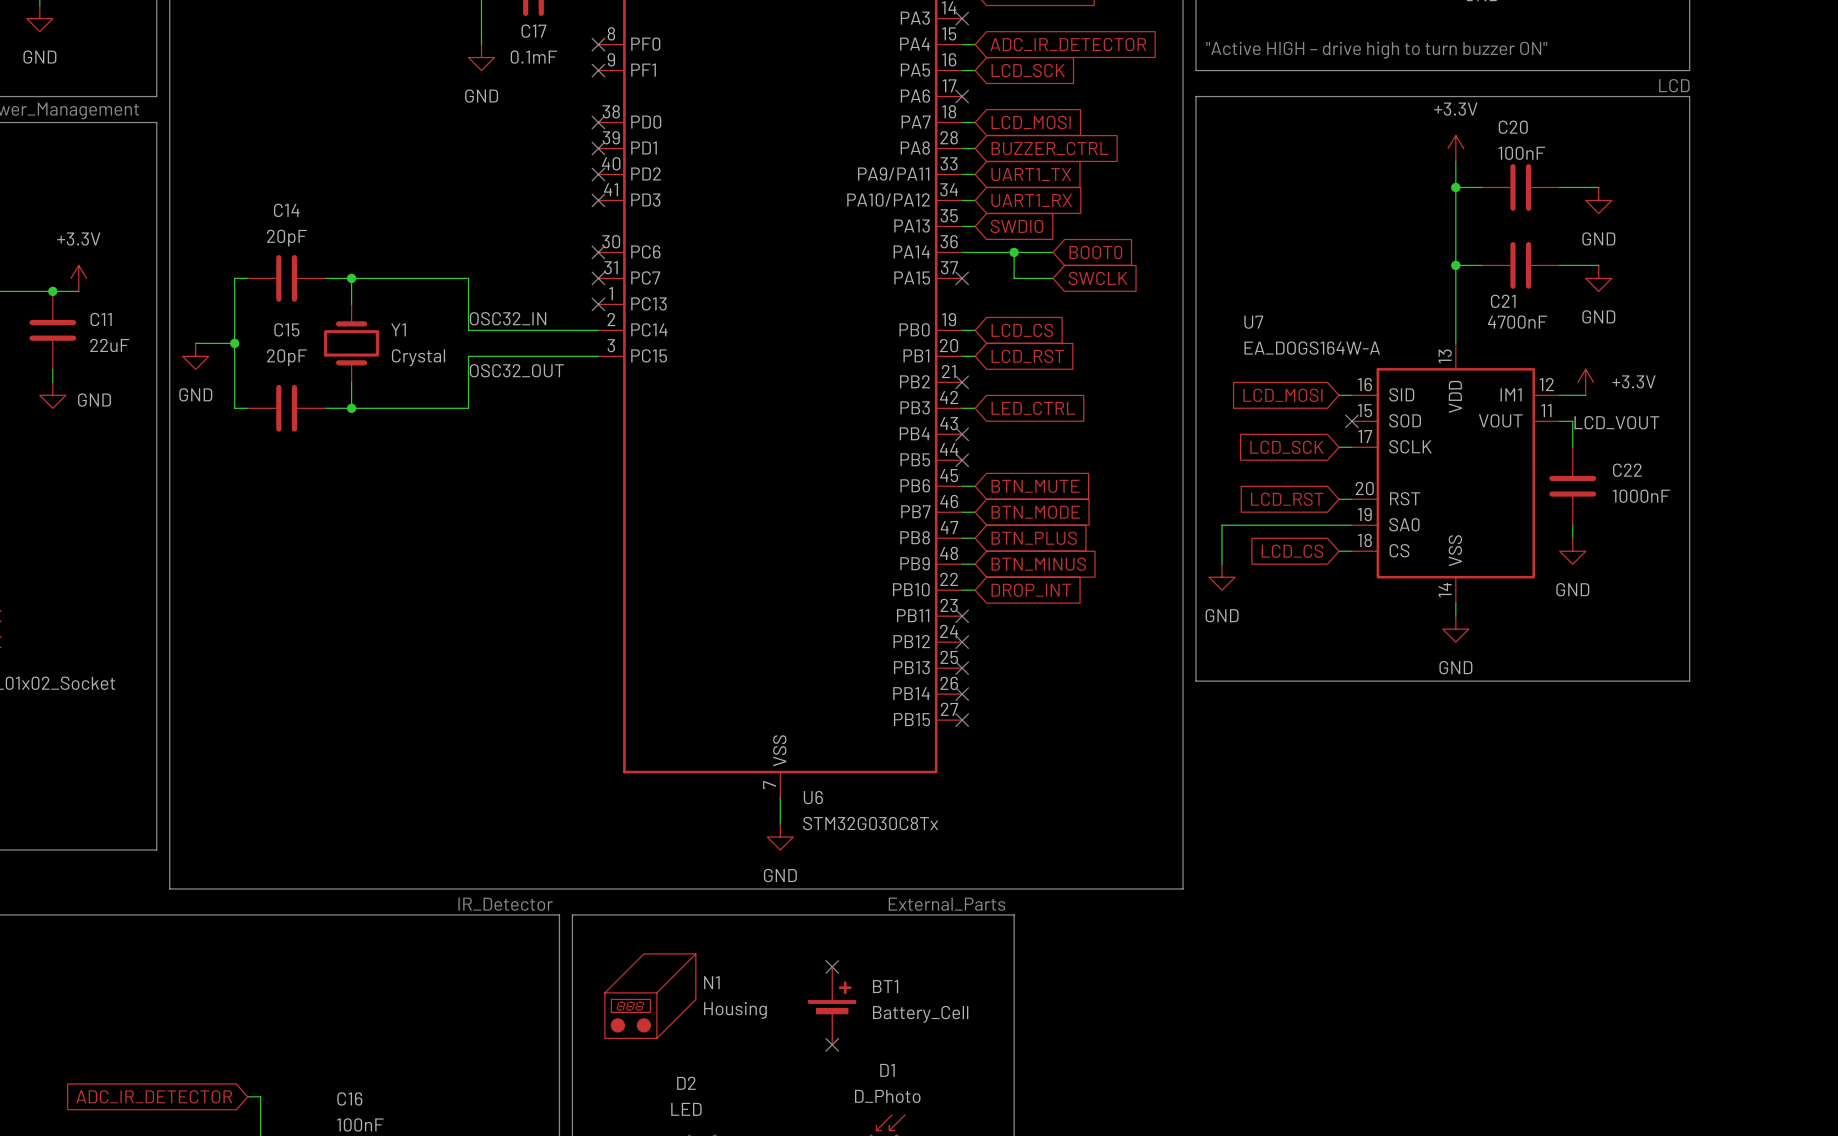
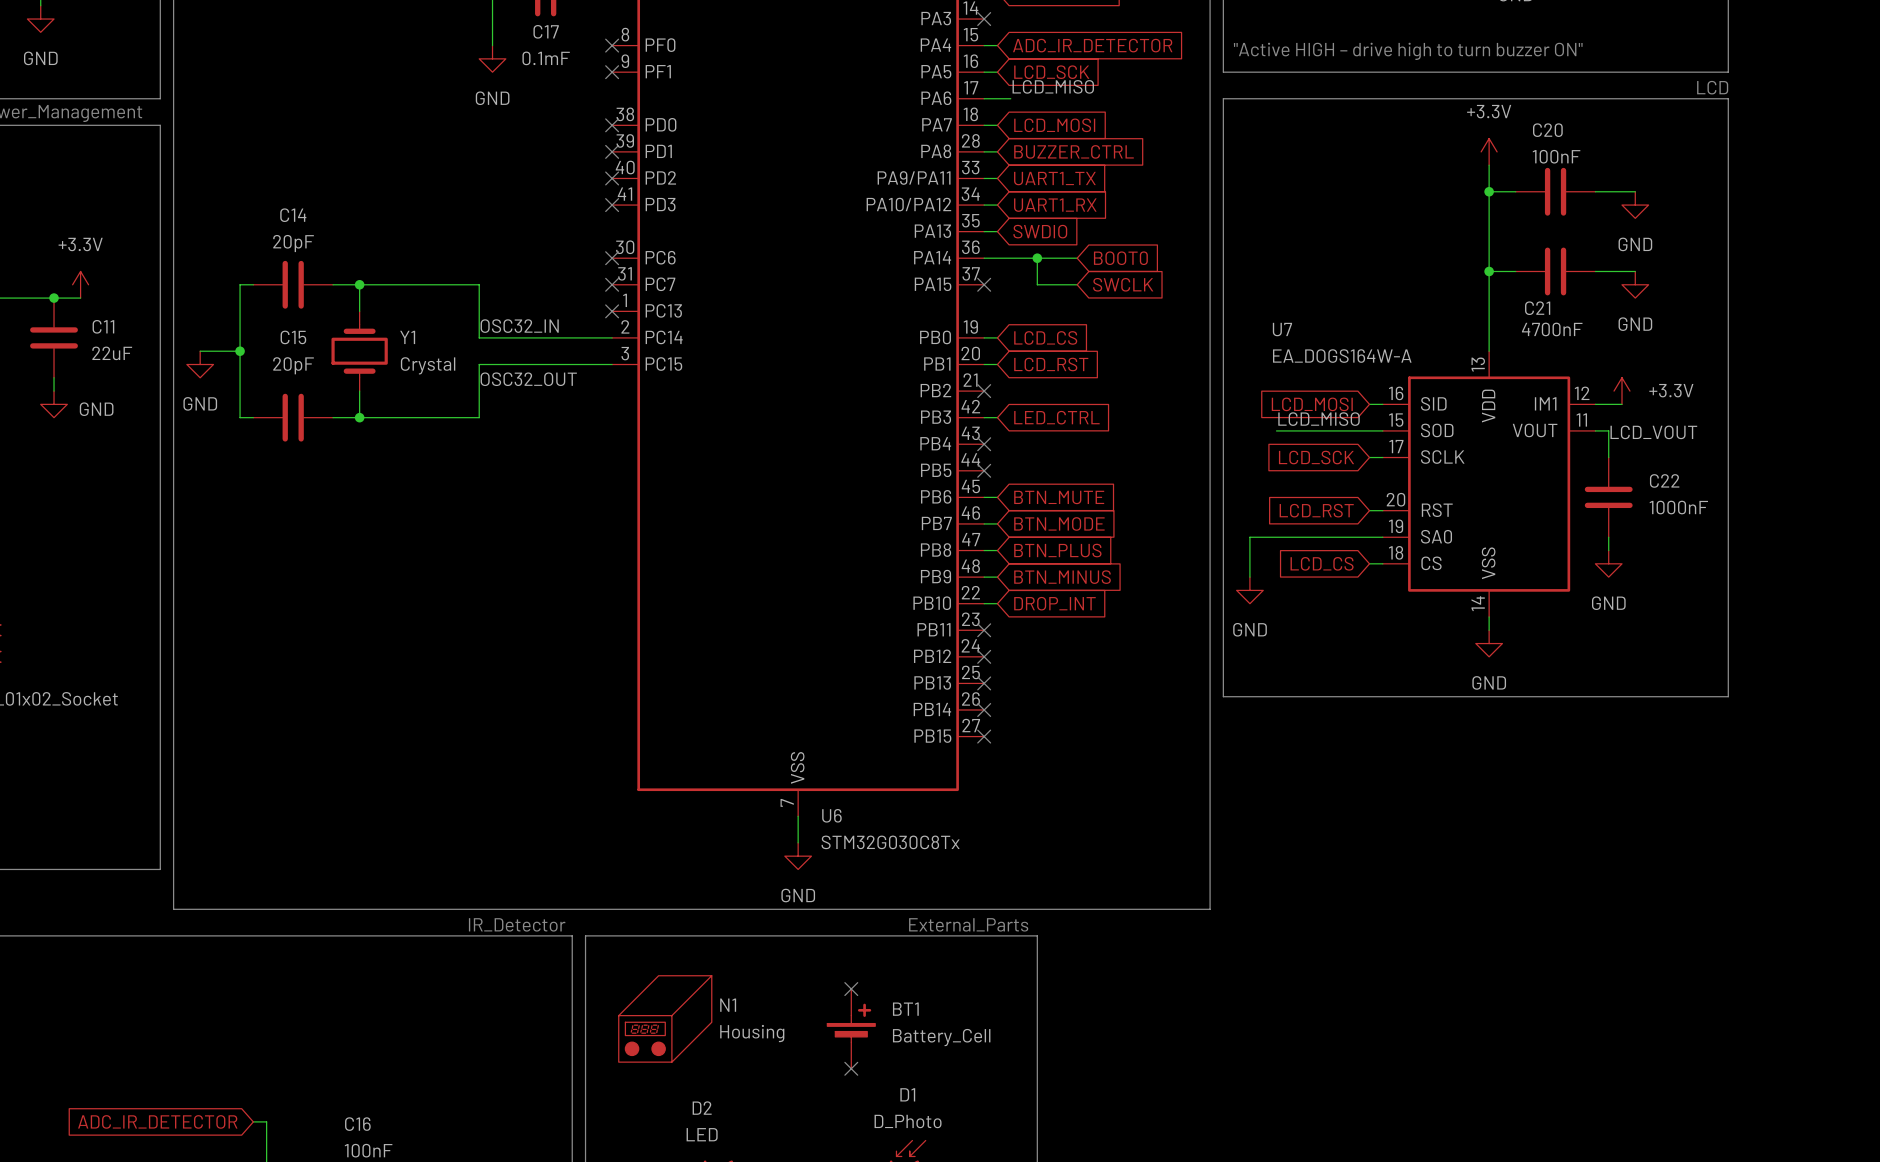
label: none -> LCD_MISO (1053, 86)
wire: none -> (984, 98) (1010, 98)
no-connect mark: (962, 96) -> none
label: none -> LCD_MISO (1319, 419)
wire: none -> (1276, 430) (1382, 430)
no-connect mark: (1351, 421) -> none

